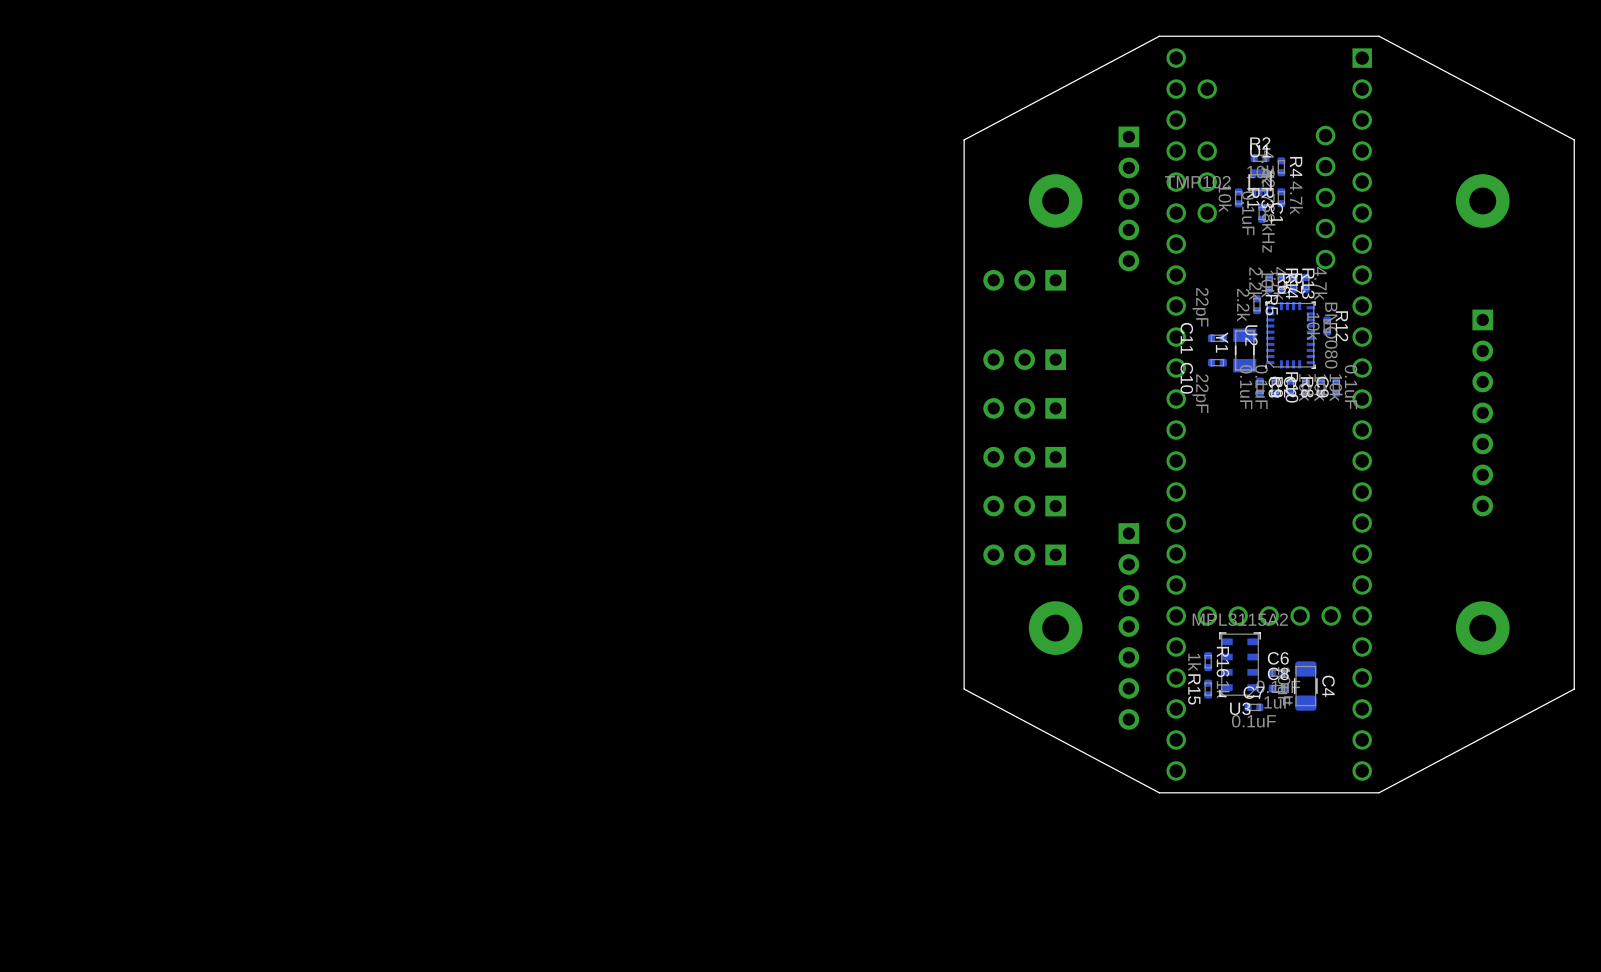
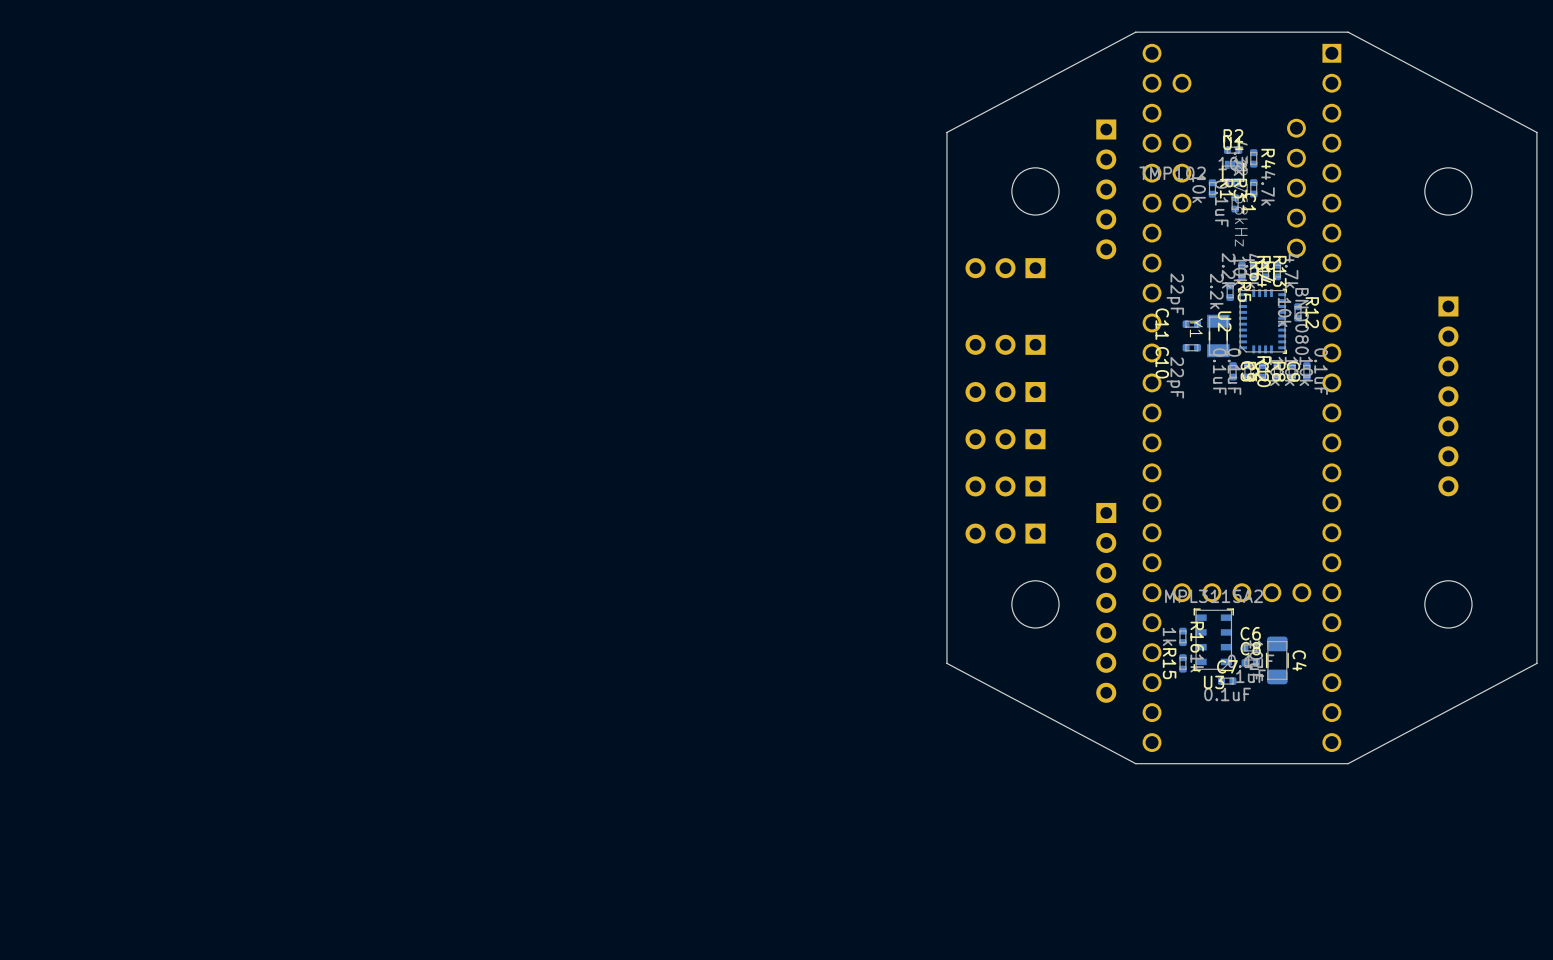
round board edge: none -> [1011, 167, 1060, 216]
round board edge: none -> [1424, 167, 1473, 216]
part: (1055, 200) -> none
part: (1482, 200) -> none
round board edge: none -> [1011, 580, 1060, 629]
round board edge: none -> [1424, 580, 1473, 629]
part: (1055, 628) -> none
part: (1482, 628) -> none

